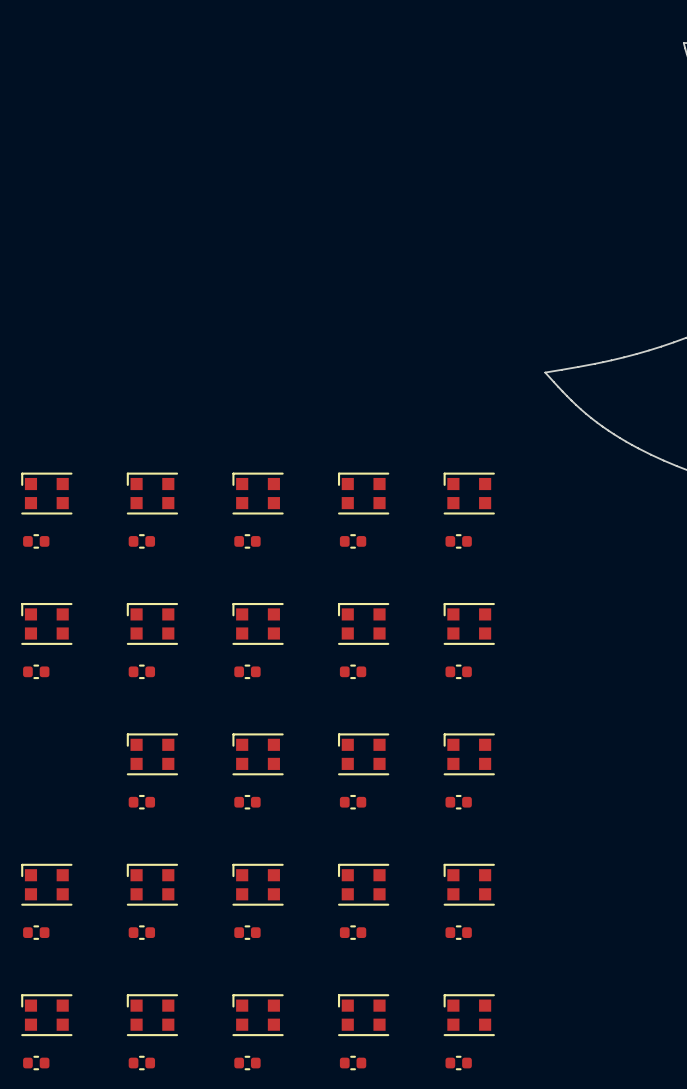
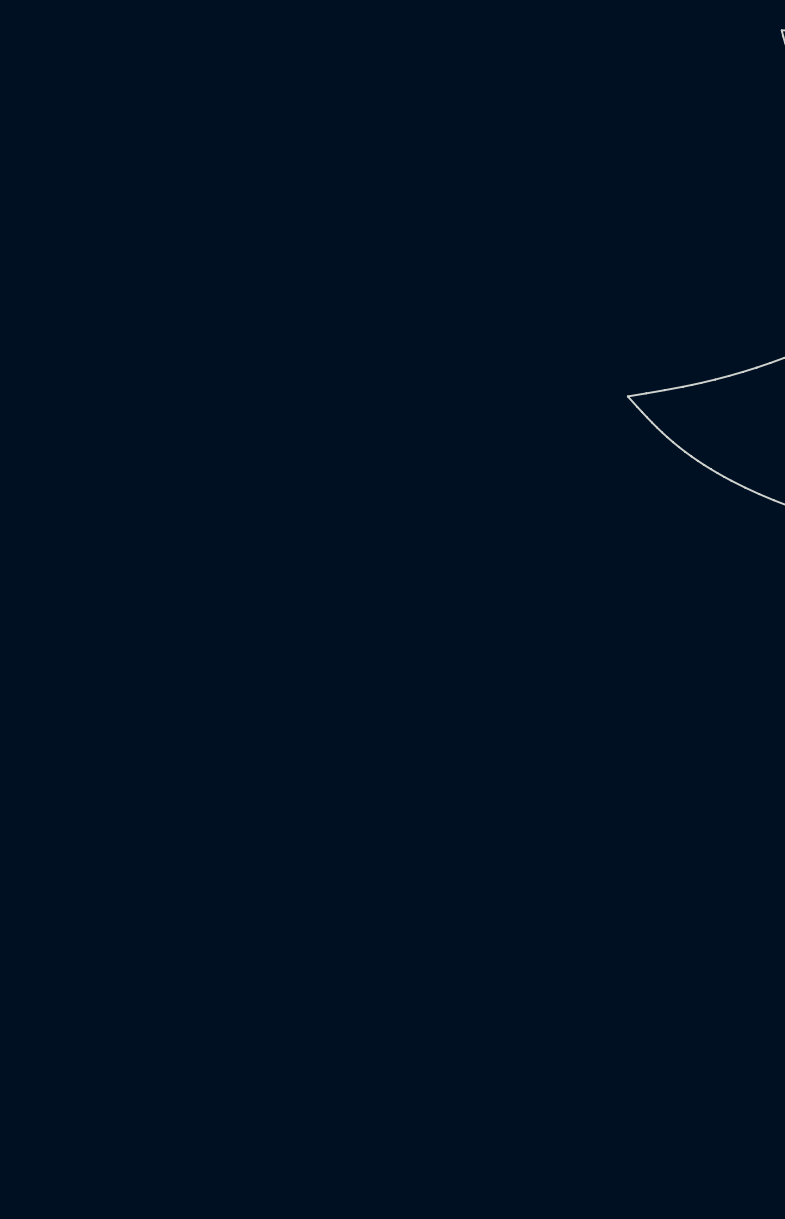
part: (46, 493) -> none
part: (152, 493) -> none
part: (258, 493) -> none
part: (363, 493) -> none
part: (469, 493) -> none
part: (36, 541) -> none
part: (141, 541) -> none
part: (247, 541) -> none
part: (353, 541) -> none
part: (458, 541) -> none
part: (46, 623) -> none
part: (152, 623) -> none
part: (258, 623) -> none
part: (363, 623) -> none
part: (469, 623) -> none
part: (36, 671) -> none
part: (141, 671) -> none
part: (247, 671) -> none
part: (353, 671) -> none
part: (458, 671) -> none
part: (152, 754) -> none
part: (258, 754) -> none
part: (363, 754) -> none
part: (469, 754) -> none
part: (141, 802) -> none
part: (247, 802) -> none
part: (353, 802) -> none
part: (458, 802) -> none
part: (46, 884) -> none
part: (152, 884) -> none
part: (258, 884) -> none
part: (363, 884) -> none
part: (469, 884) -> none
part: (36, 932) -> none
part: (141, 932) -> none
part: (247, 932) -> none
part: (353, 932) -> none
part: (458, 932) -> none
part: (46, 1015) -> none
part: (152, 1015) -> none
part: (258, 1015) -> none
part: (363, 1015) -> none
part: (469, 1015) -> none
part: (36, 1063) -> none
part: (141, 1063) -> none
part: (247, 1063) -> none
part: (353, 1063) -> none
part: (458, 1063) -> none

